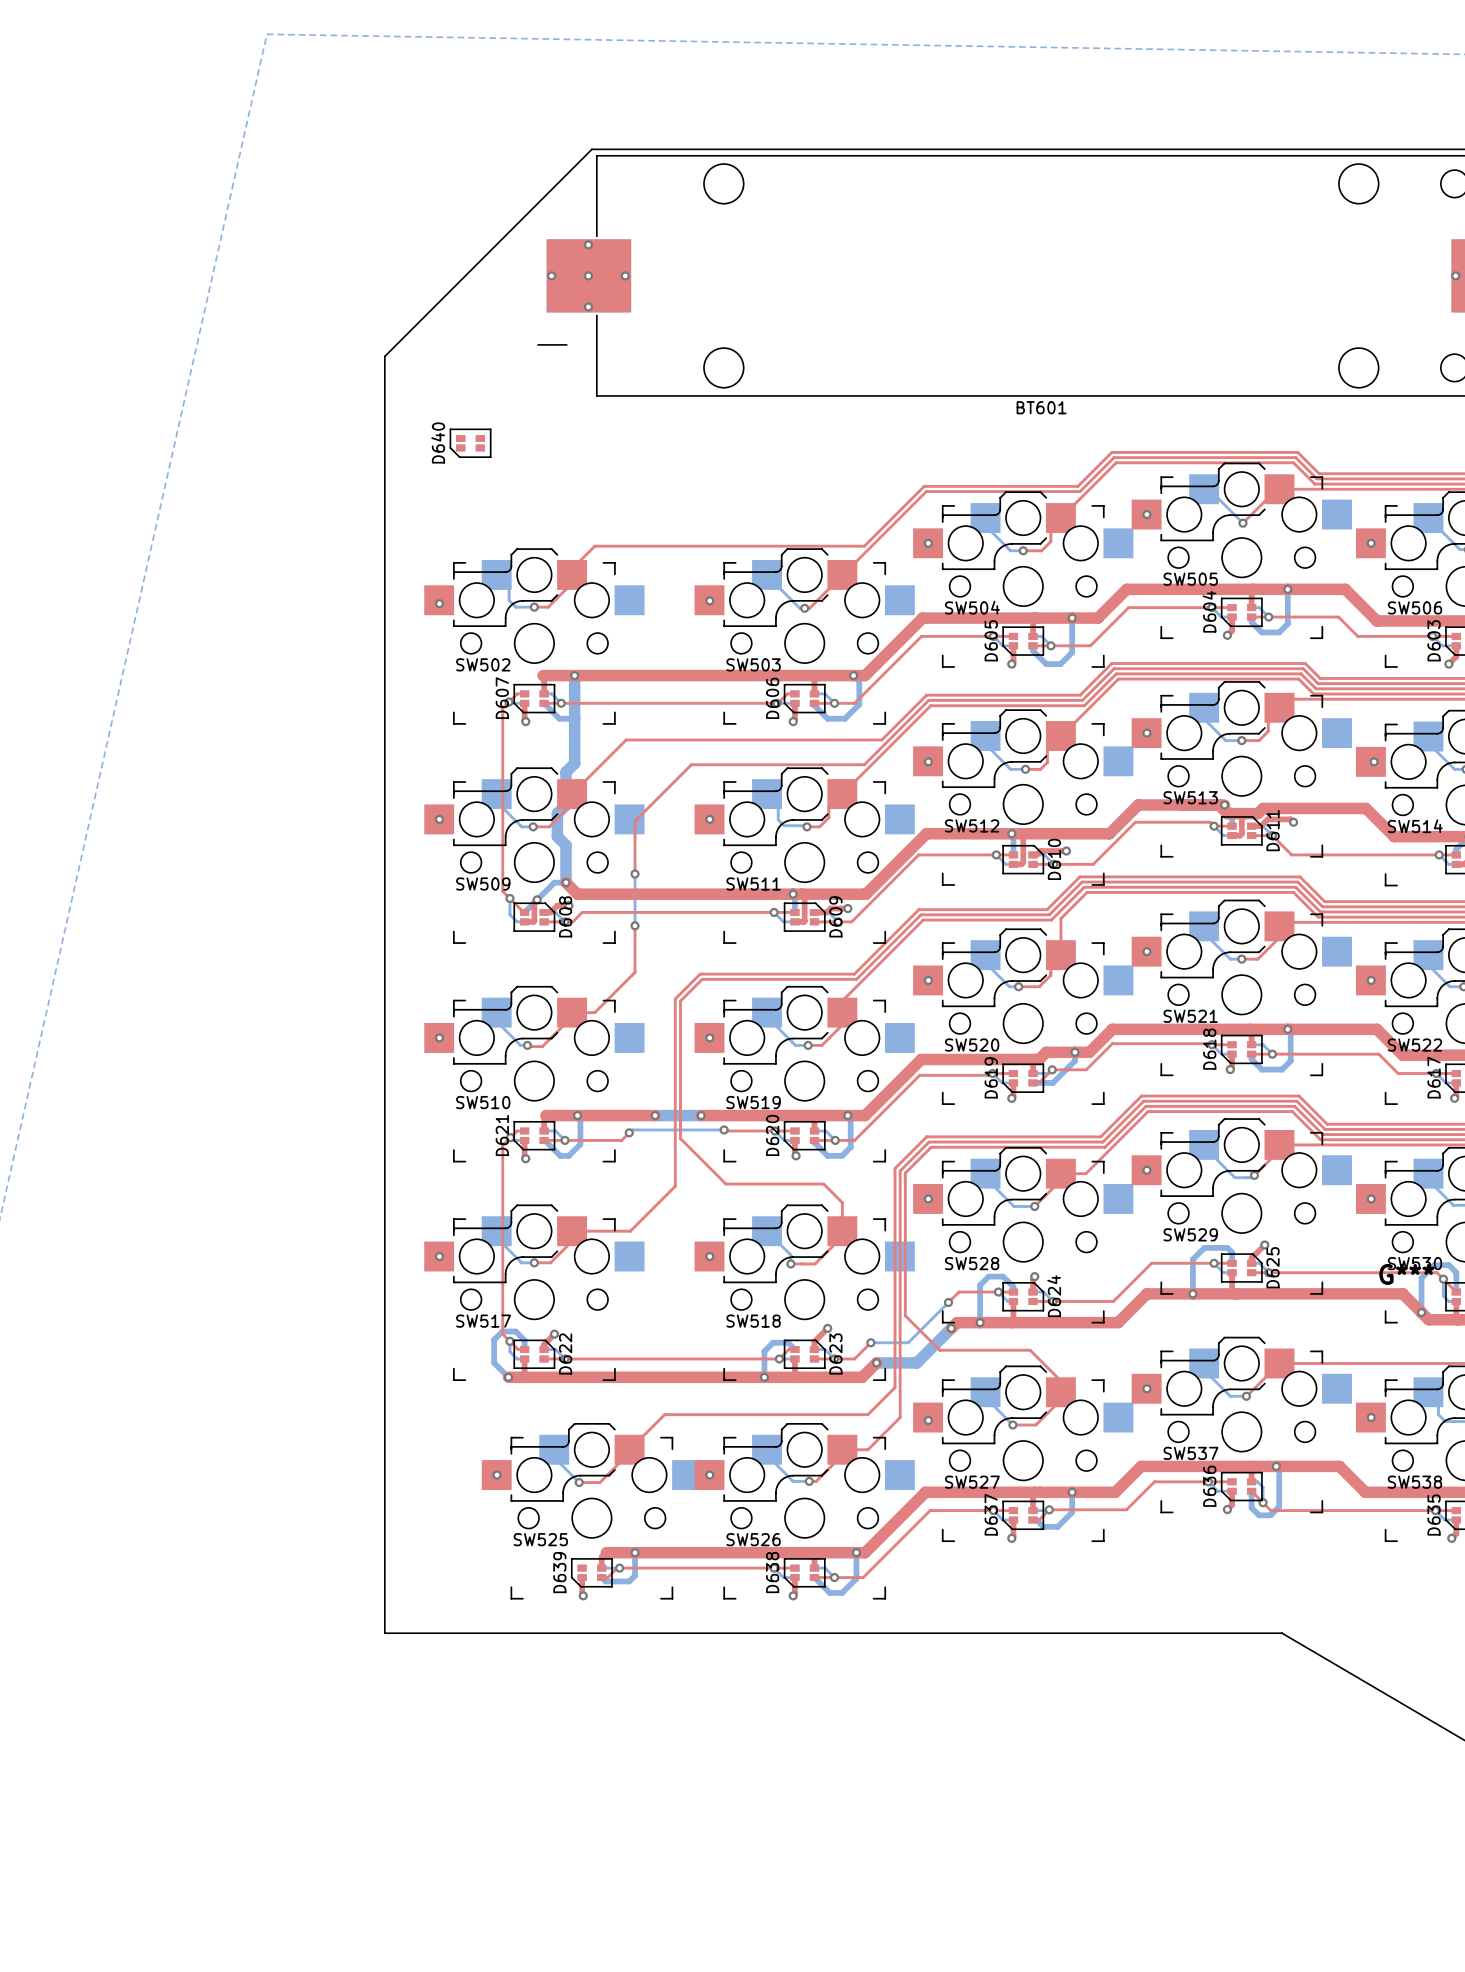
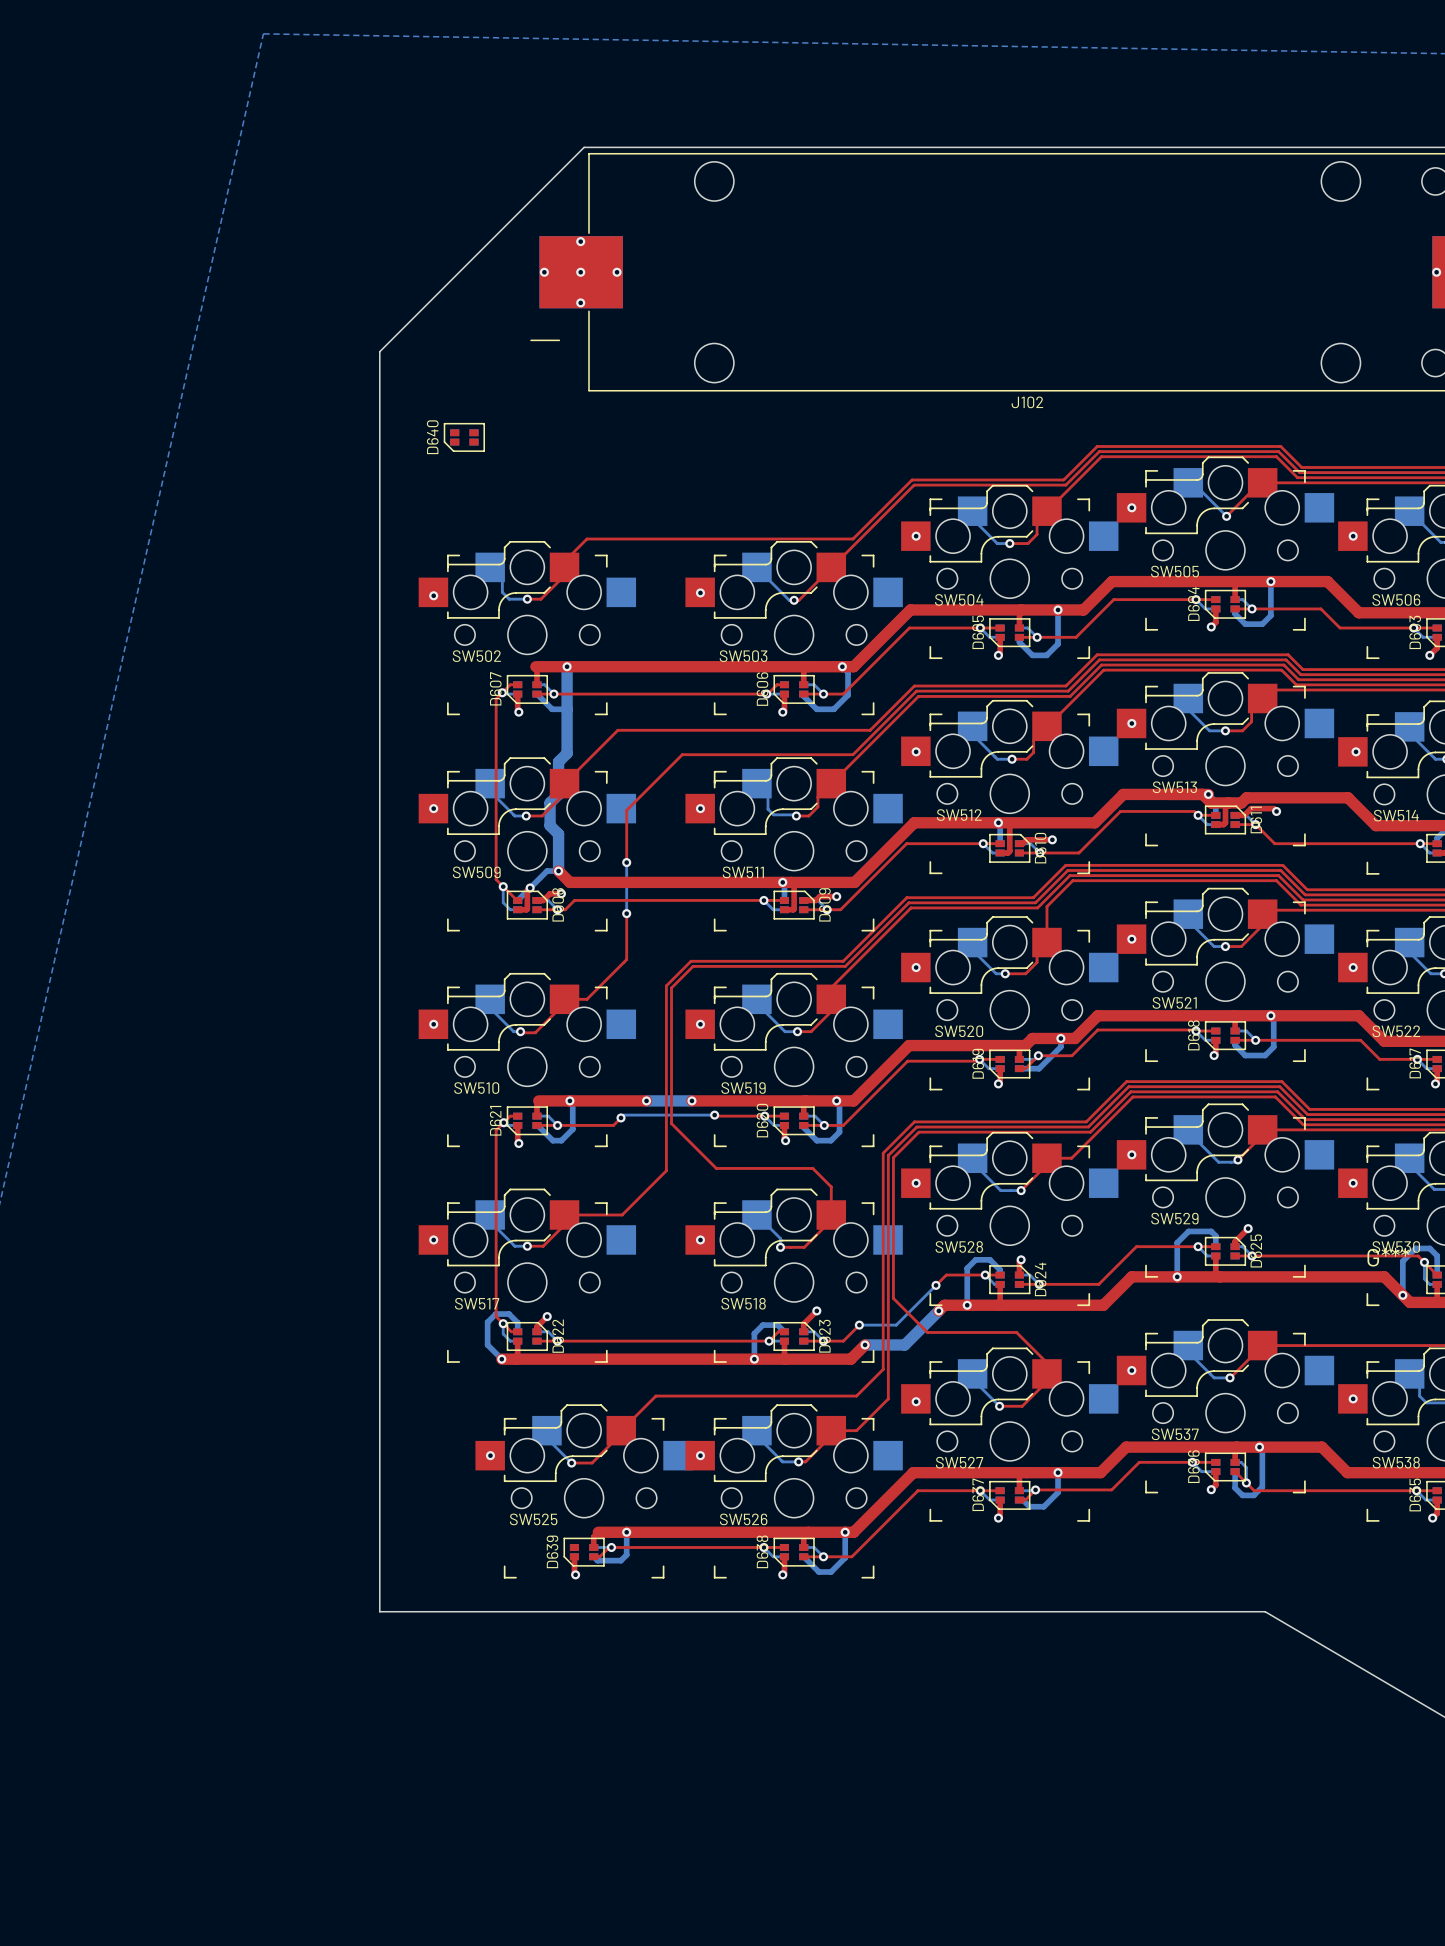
BT601 name: BT601 (1041, 407) -> J102 (1027, 402)

